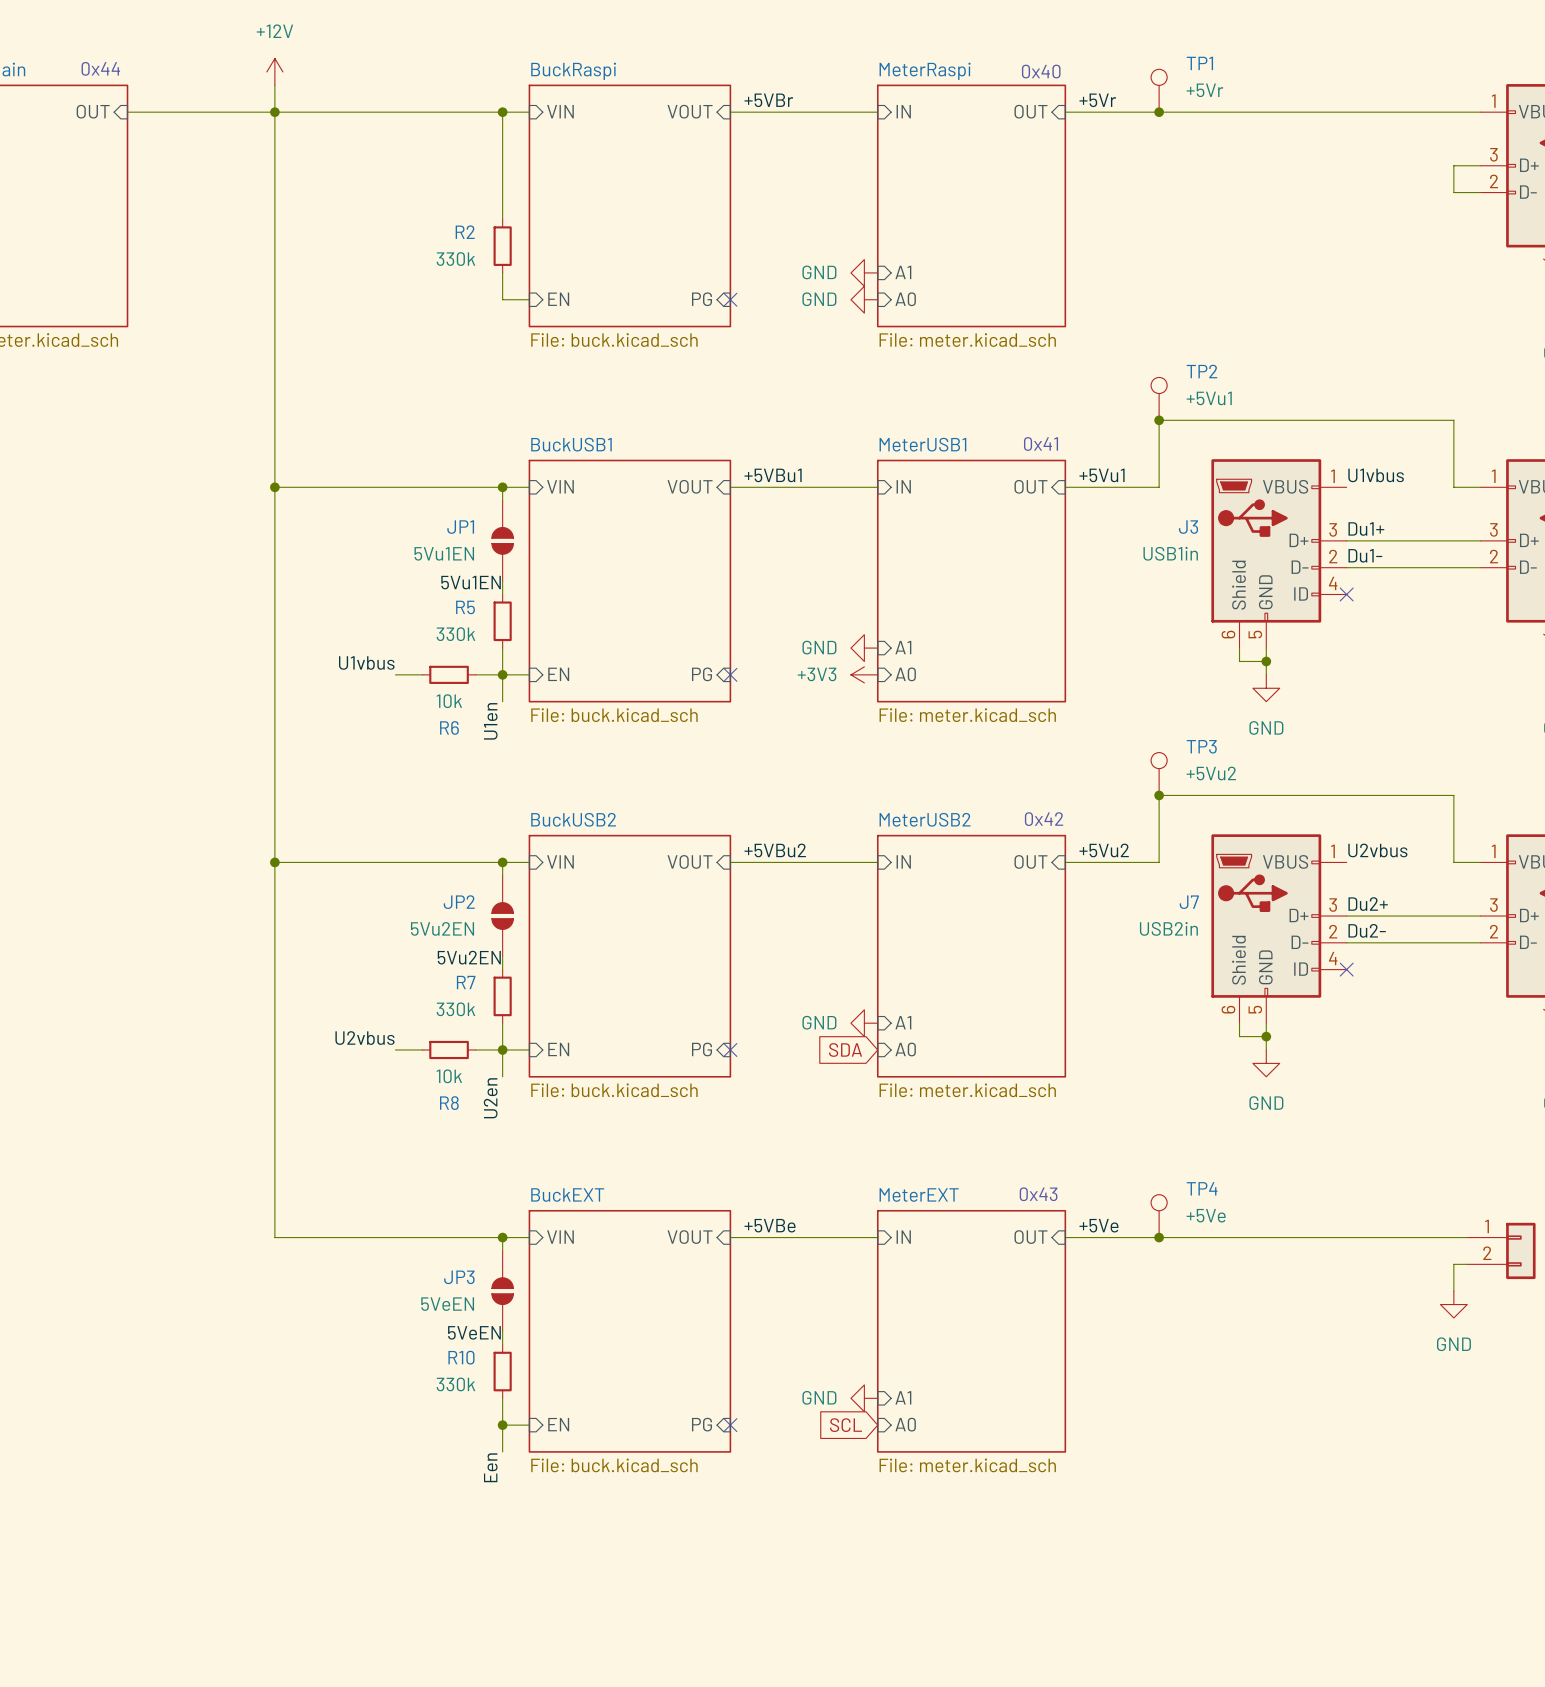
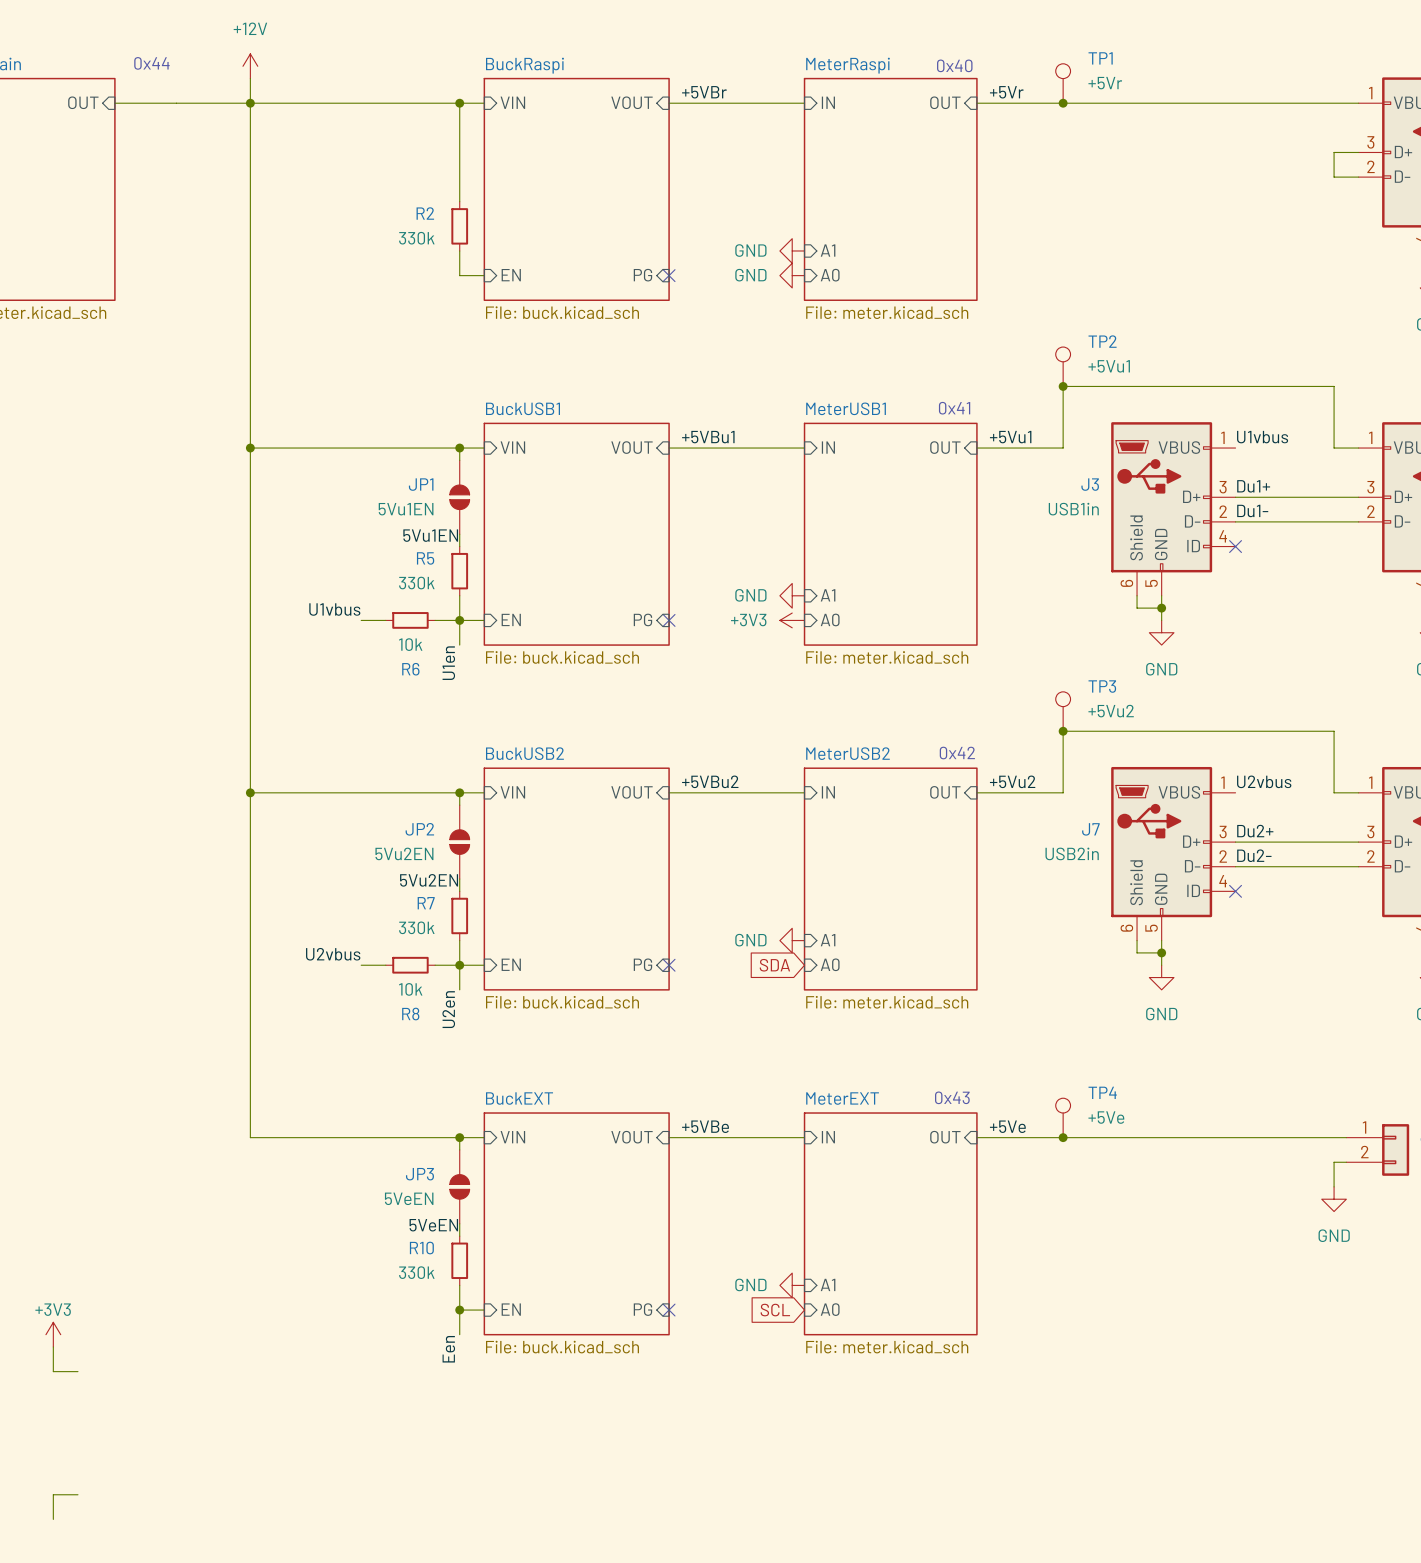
text position: 0x44 (100, 68) -> 0x44 (151, 63)
power symbol: none -> +3V3 (53, 1334)
wire: none -> (53, 1346) (53, 1371) (77, 1371)
wire: none -> (77, 1494) (53, 1494) (53, 1519)

